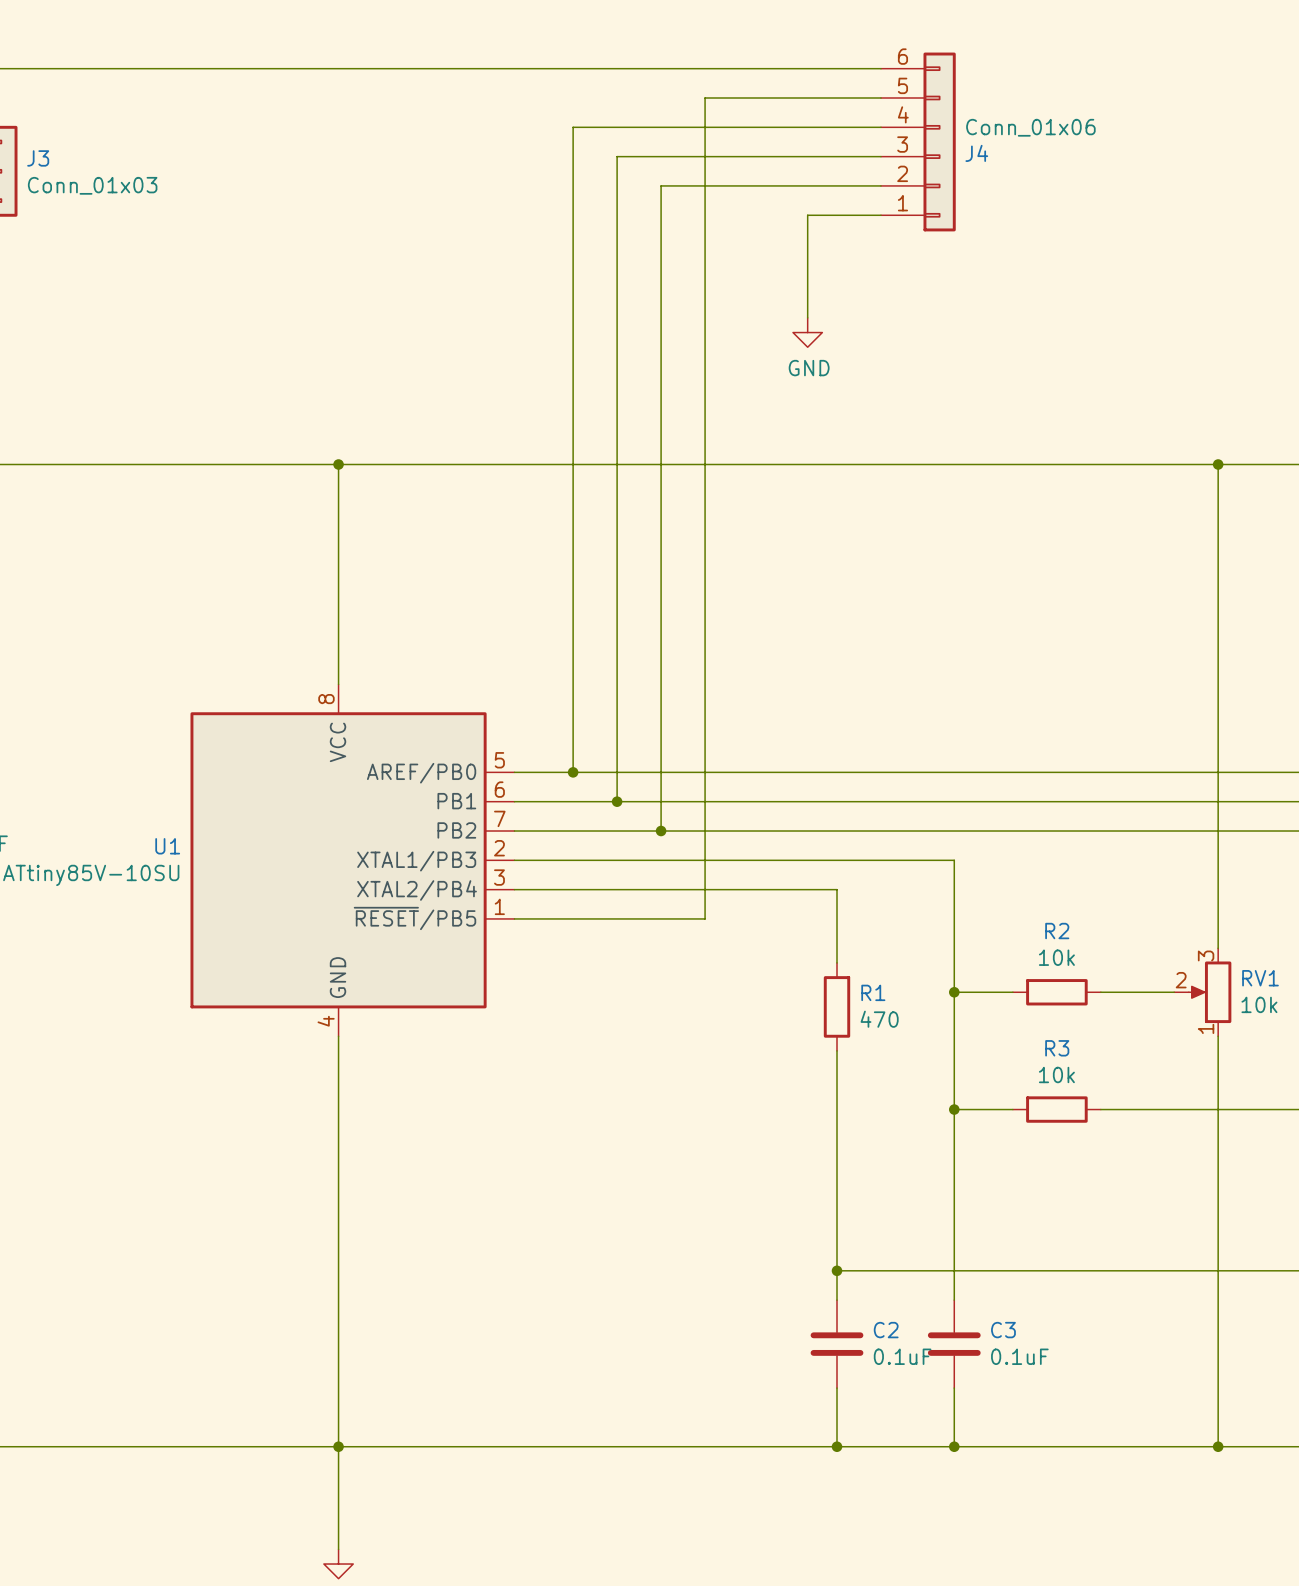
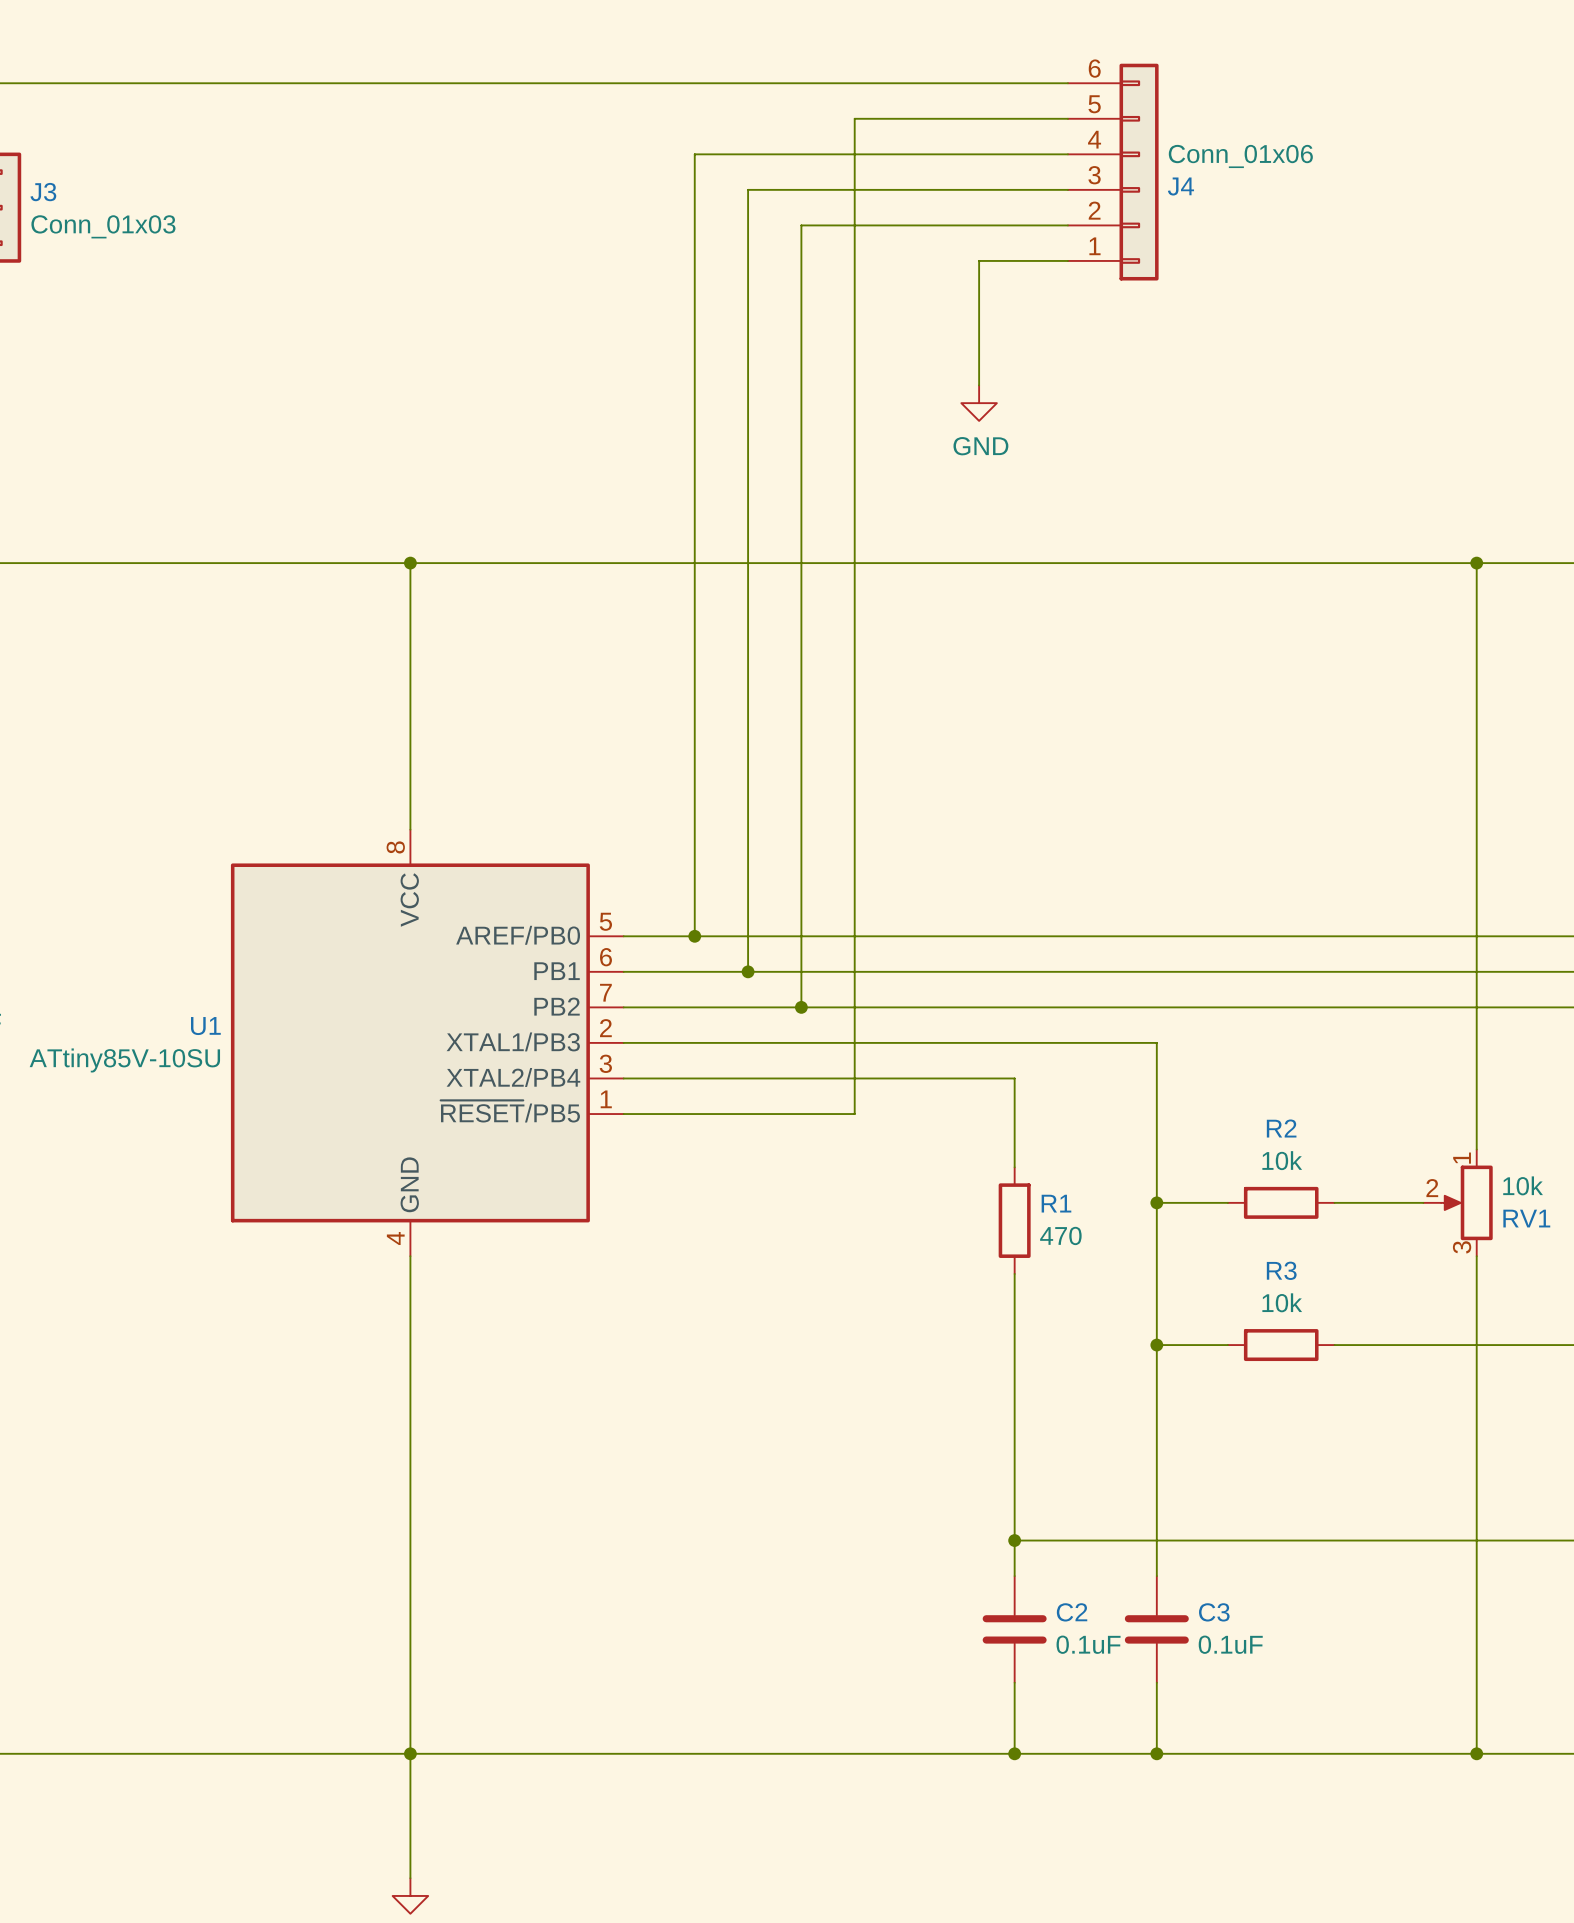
RV1 flip: as is (1210, 992) -> up-down (1466, 1202)

